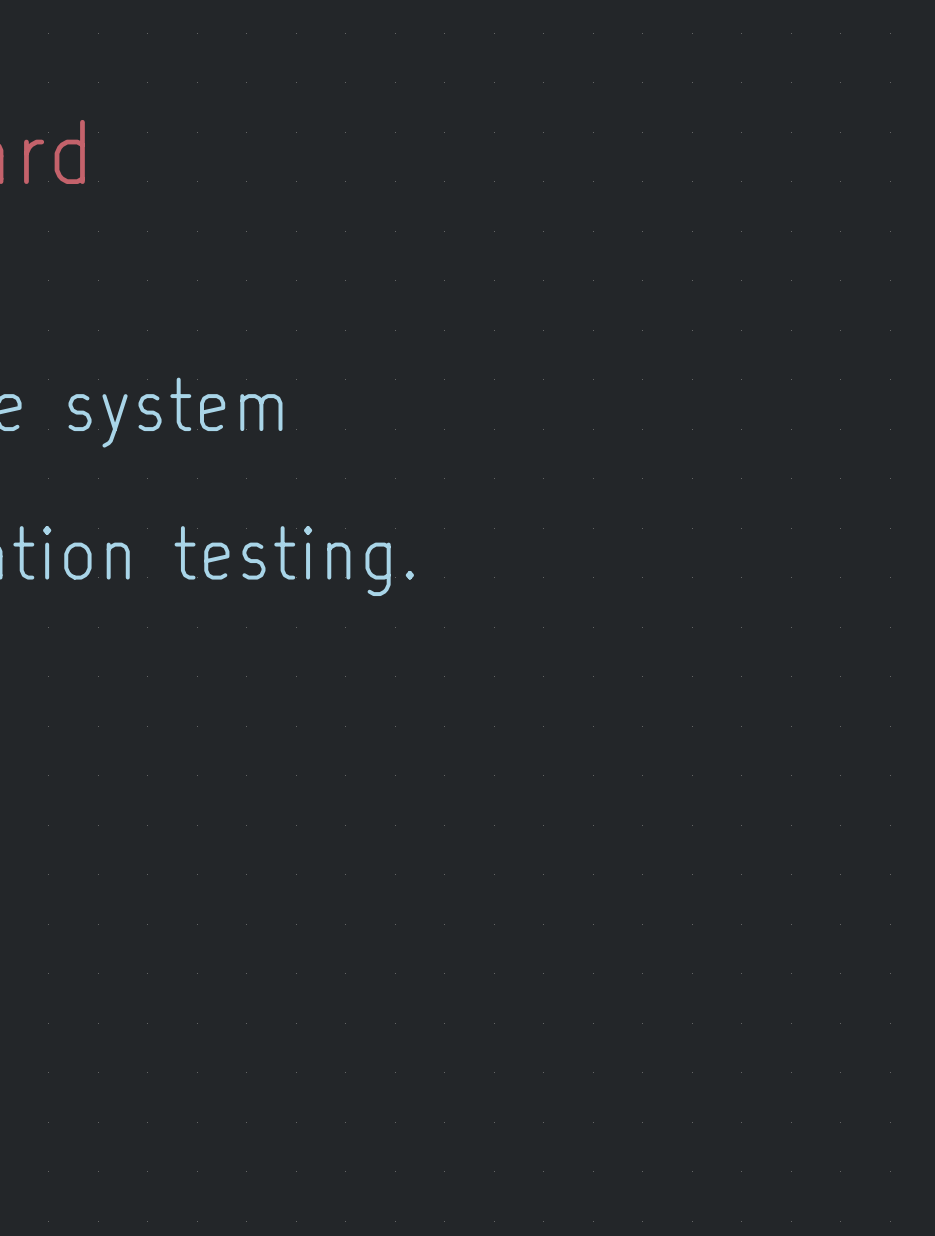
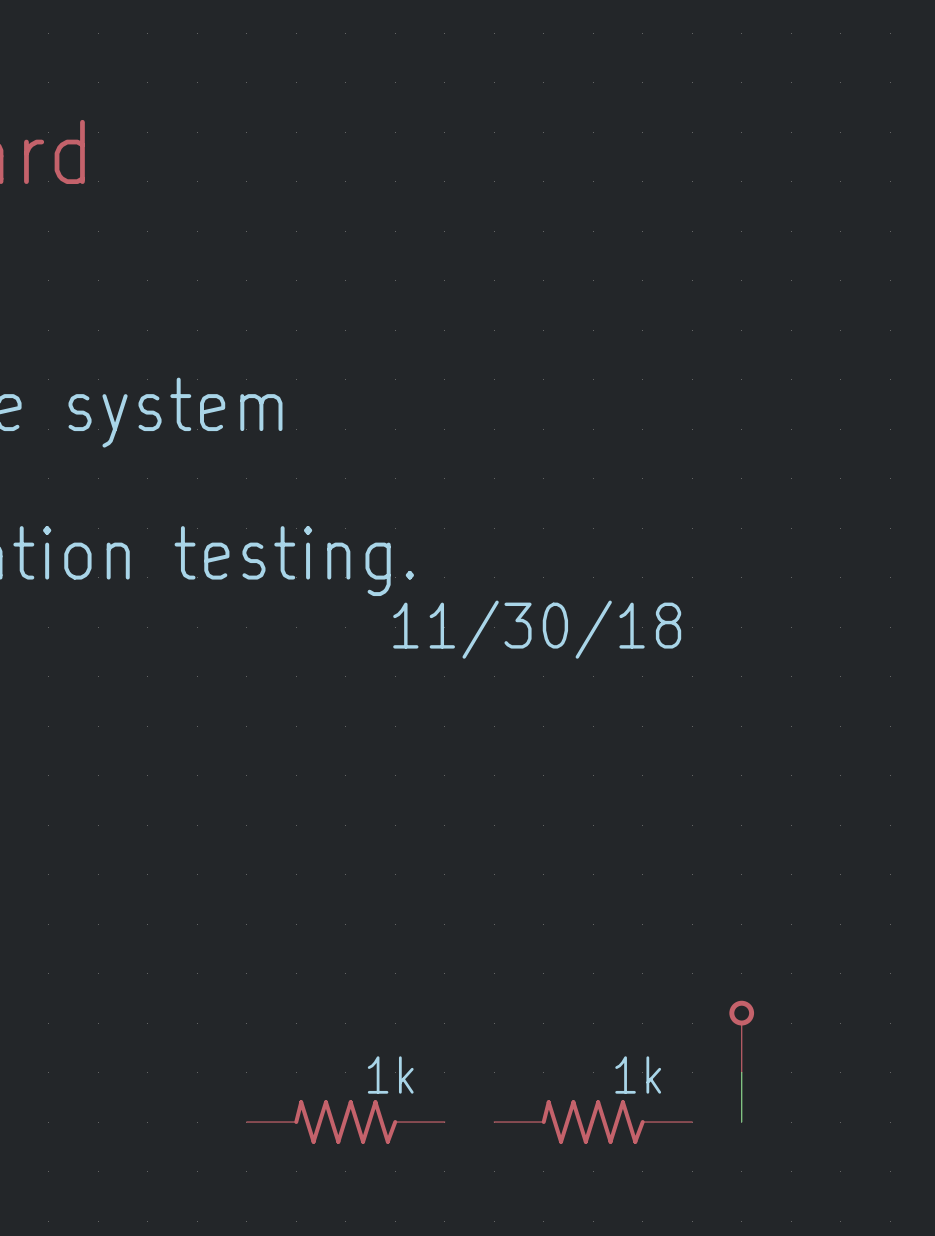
text: none -> 11/30/18 (537, 629)
part: none -> (741, 1036)
wire: none -> (741, 1072) (741, 1122)
part: none -> 1k (345, 1122)
part: none -> 1k (593, 1122)

